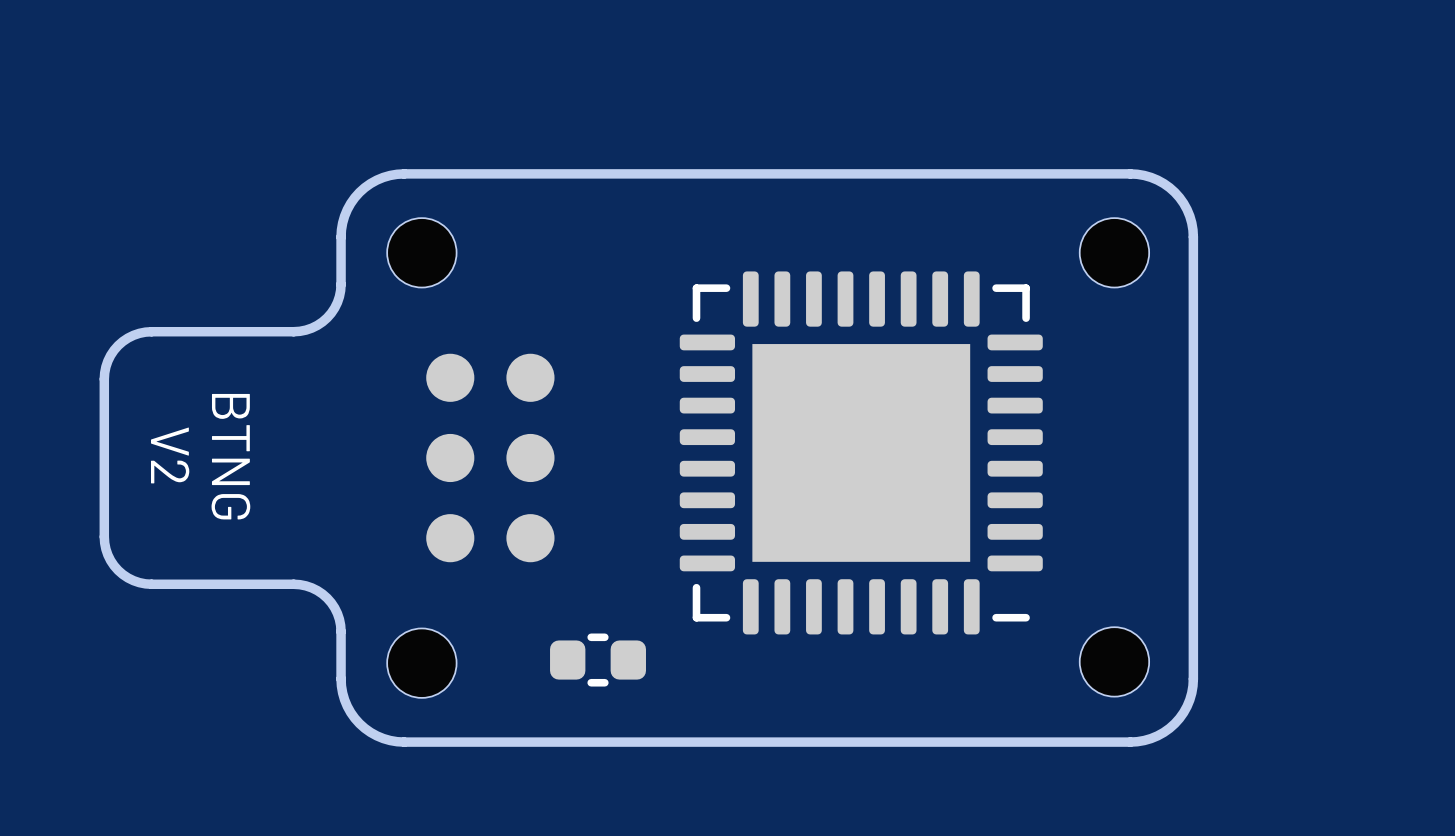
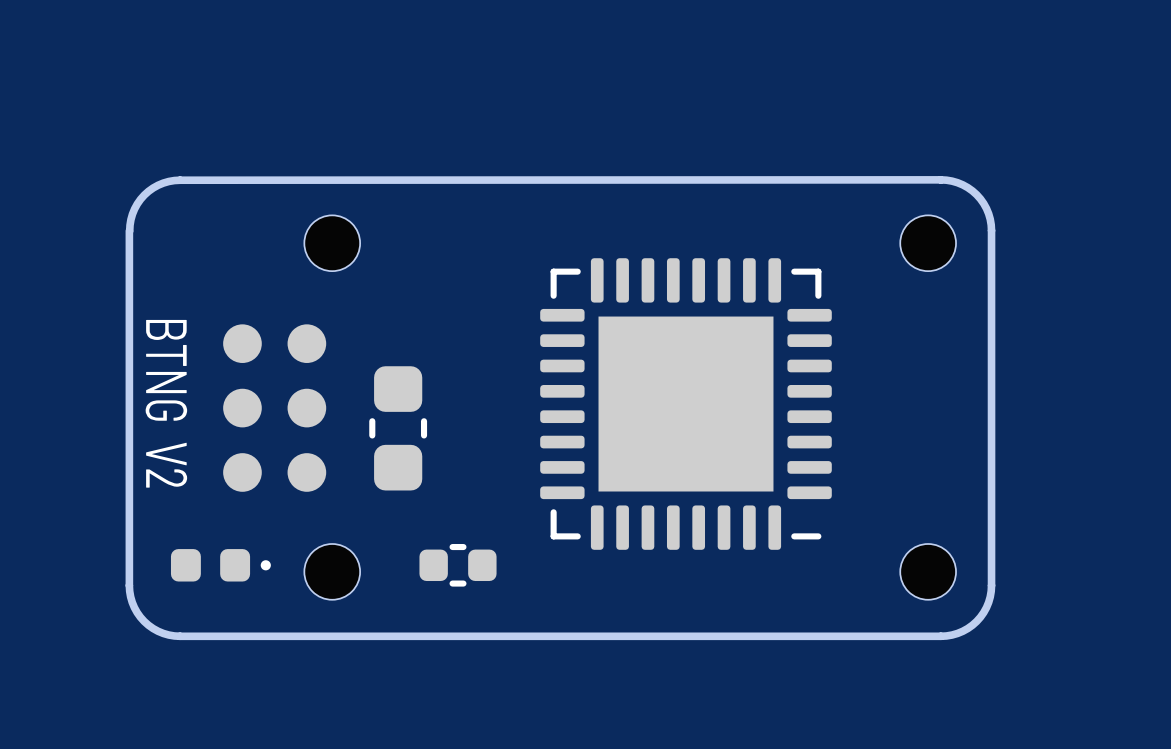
board edge: (1130, 173) (397, 174) (383, 177) (364, 187) (354, 197) (347, 209) (341, 229) (339, 296) (331, 313) (317, 325) (305, 330) (293, 331) (145, 332) (133, 335) (122, 341) (114, 350) (107, 360) (104, 379) (104, 536) (107, 555) (114, 565) (127, 577) (145, 583) (293, 584) (305, 585) (317, 590) (331, 602) (339, 619) (341, 686) (344, 699) (350, 712) (359, 723) (376, 735) (390, 740) (404, 742) -> (940, 179) (174, 180) (158, 185) (140, 199) (132, 214) (129, 230)
board edge: none -> (129, 230) (129, 585) (132, 602) (137, 612) (153, 628) (174, 635) (357, 636)
part position: (421, 252) -> (332, 243)
part footprint: [426, 353, 555, 563] -> [369, 366, 428, 491]
part position: (861, 452) -> (685, 404)
text: V2 (170, 455) -> BTNG V2 (166, 403)
text: BTNG (230, 456) -> none
part: none -> (274, 408)
part: none -> (220, 565)
part position: (598, 660) -> (458, 565)
part position: (421, 663) -> (332, 571)

